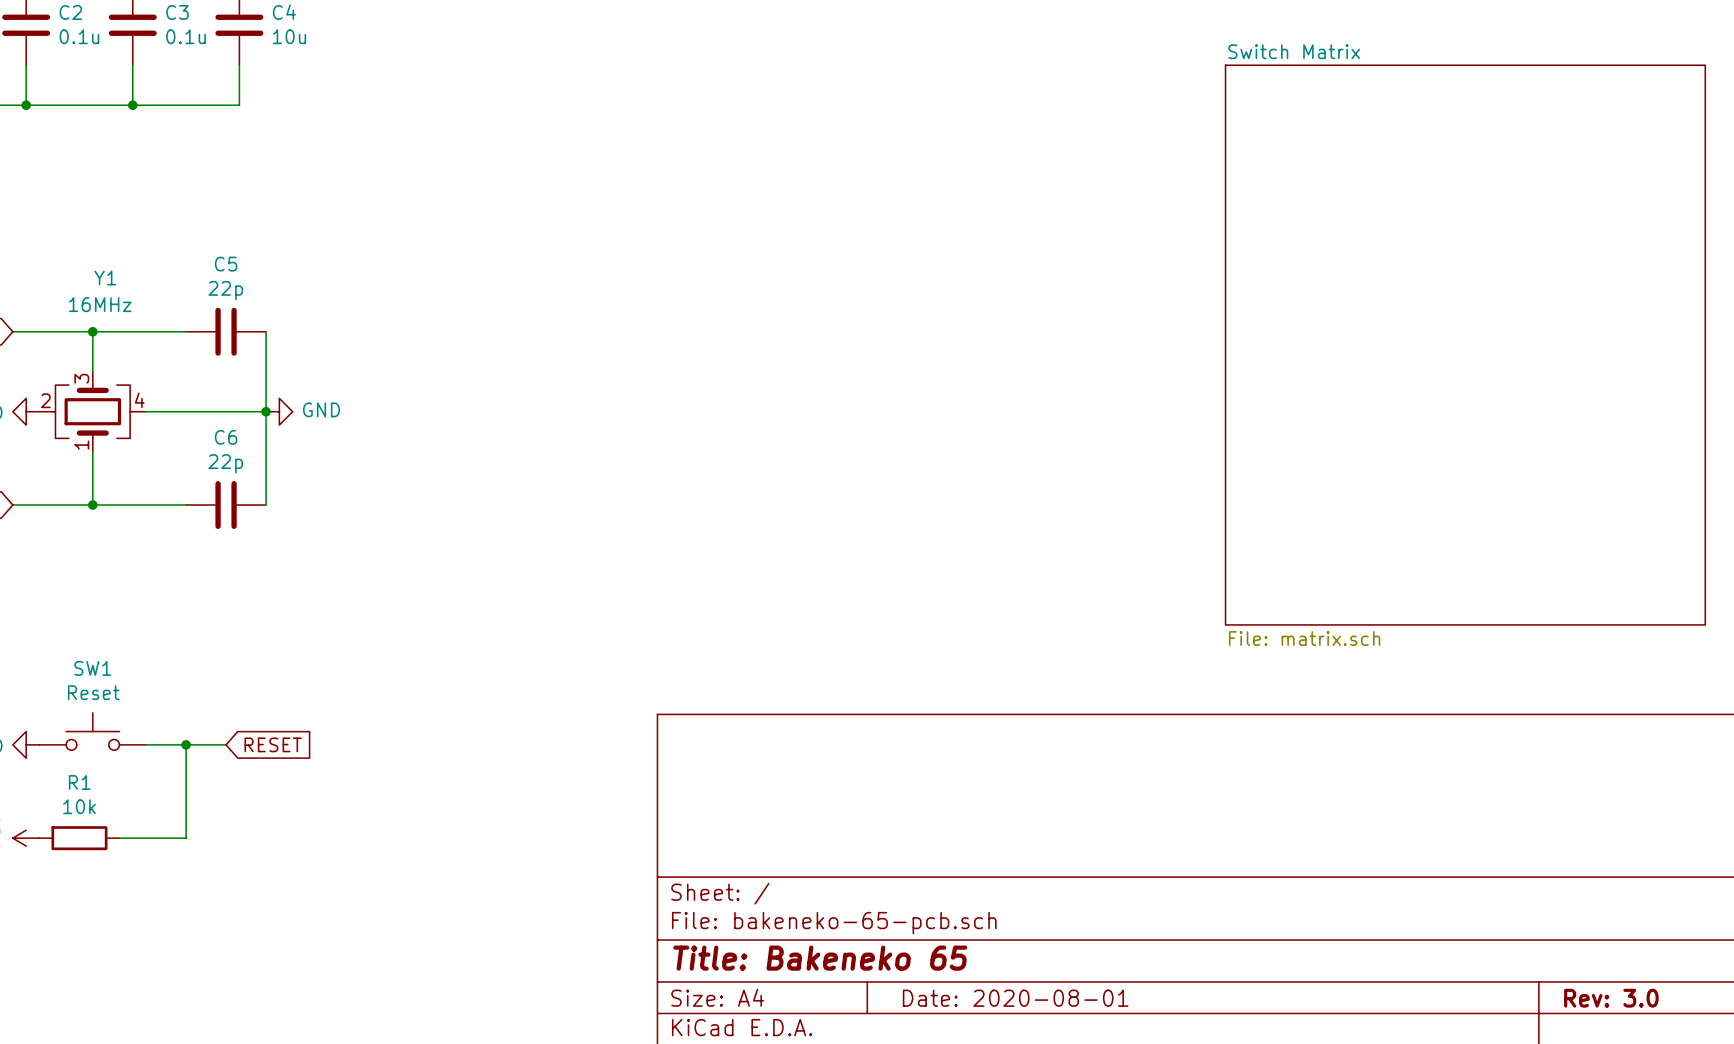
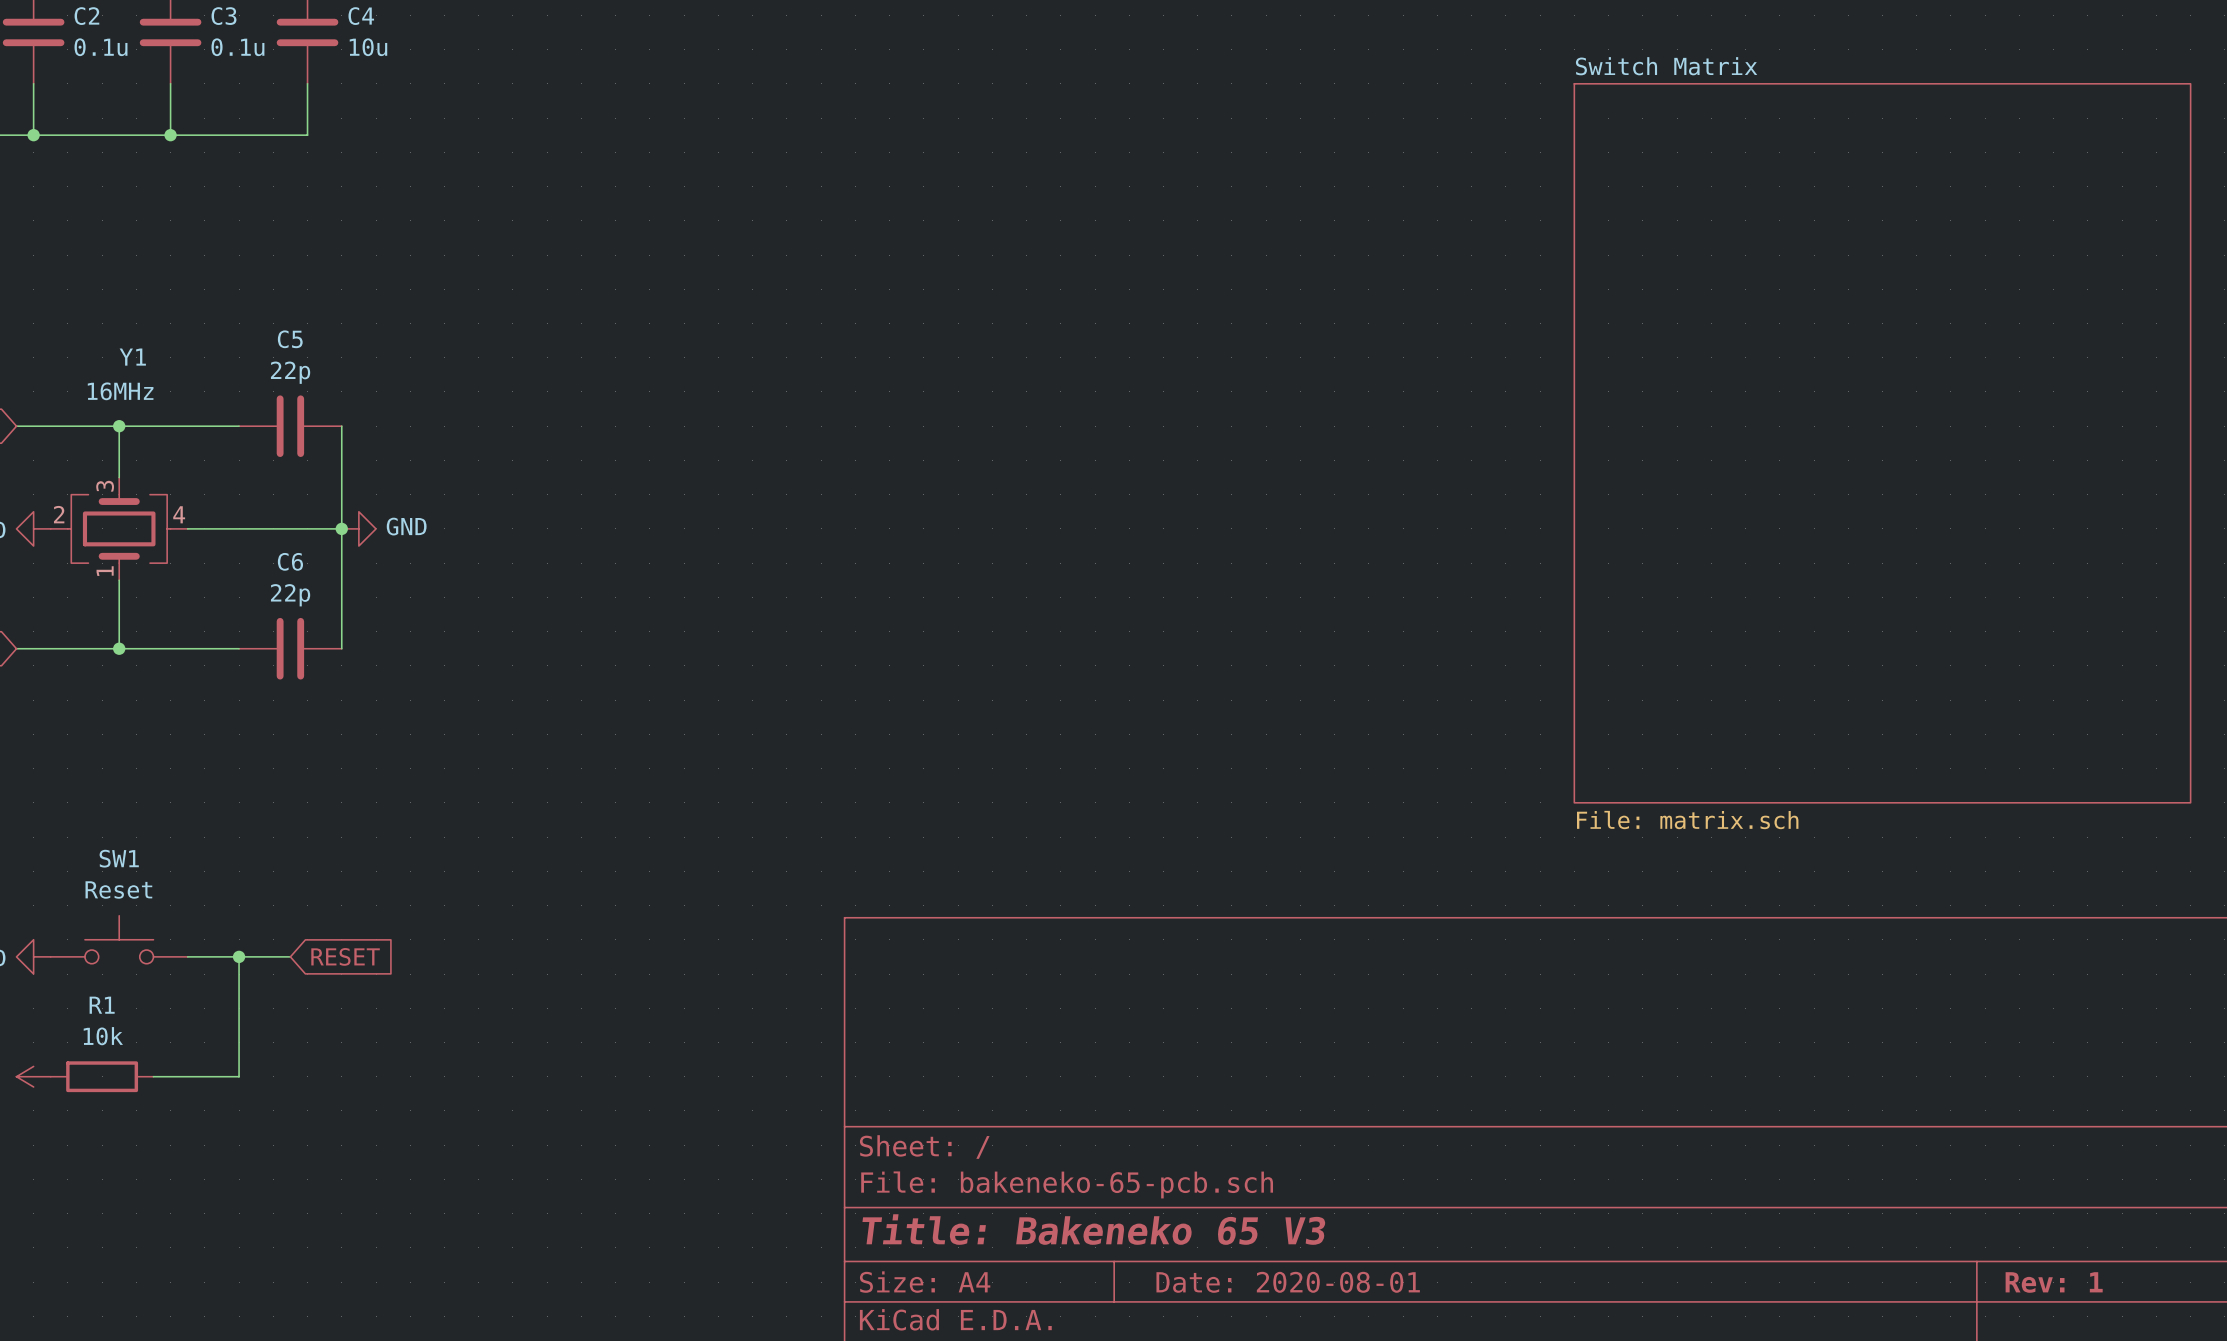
title block: Title: Bakeneko 65 (820, 958) -> Title: Bakeneko 65 V3 (1093, 1229)
title block: Rev: 3.0 (1611, 998) -> Rev: 1 (2054, 1282)

